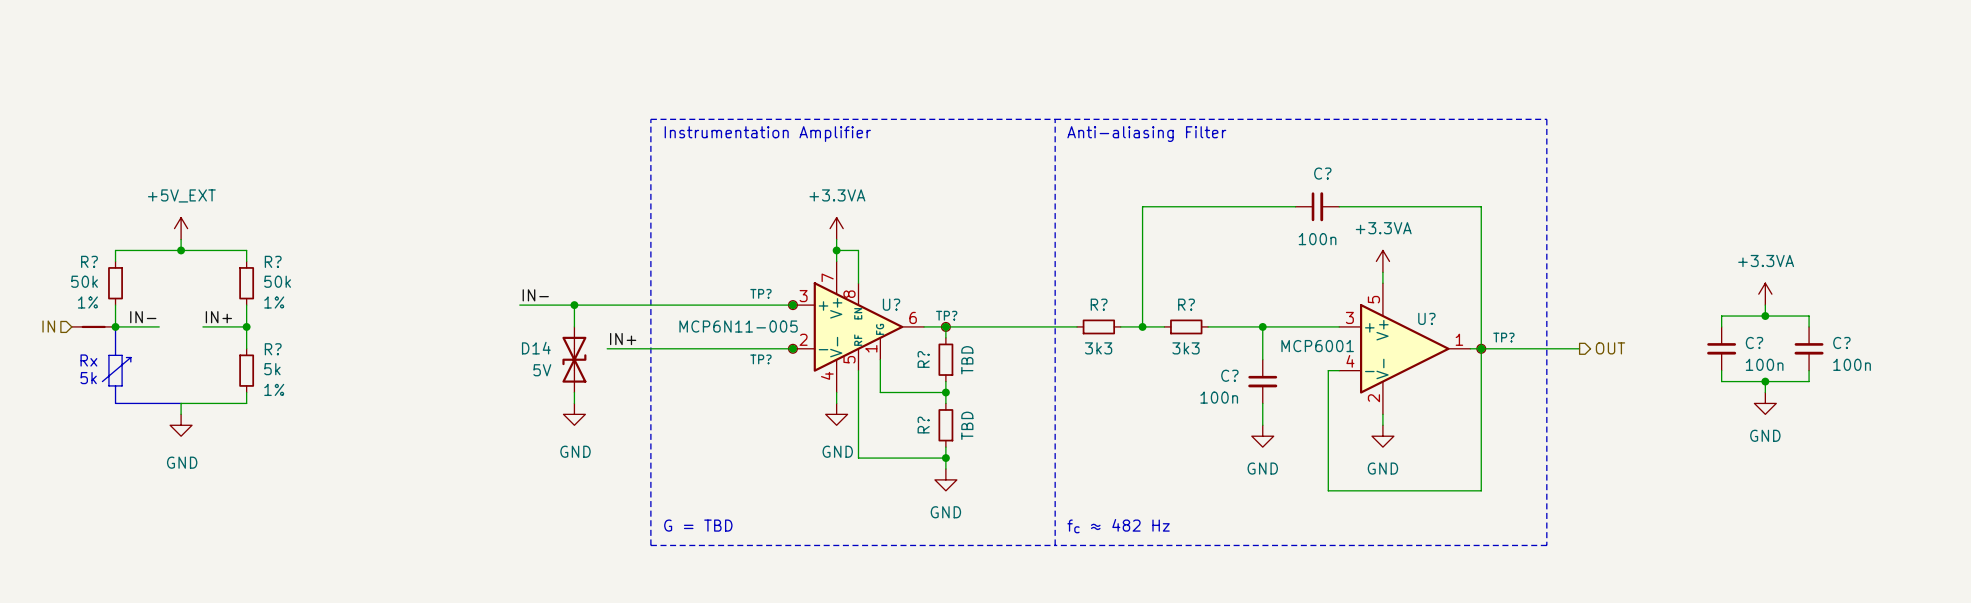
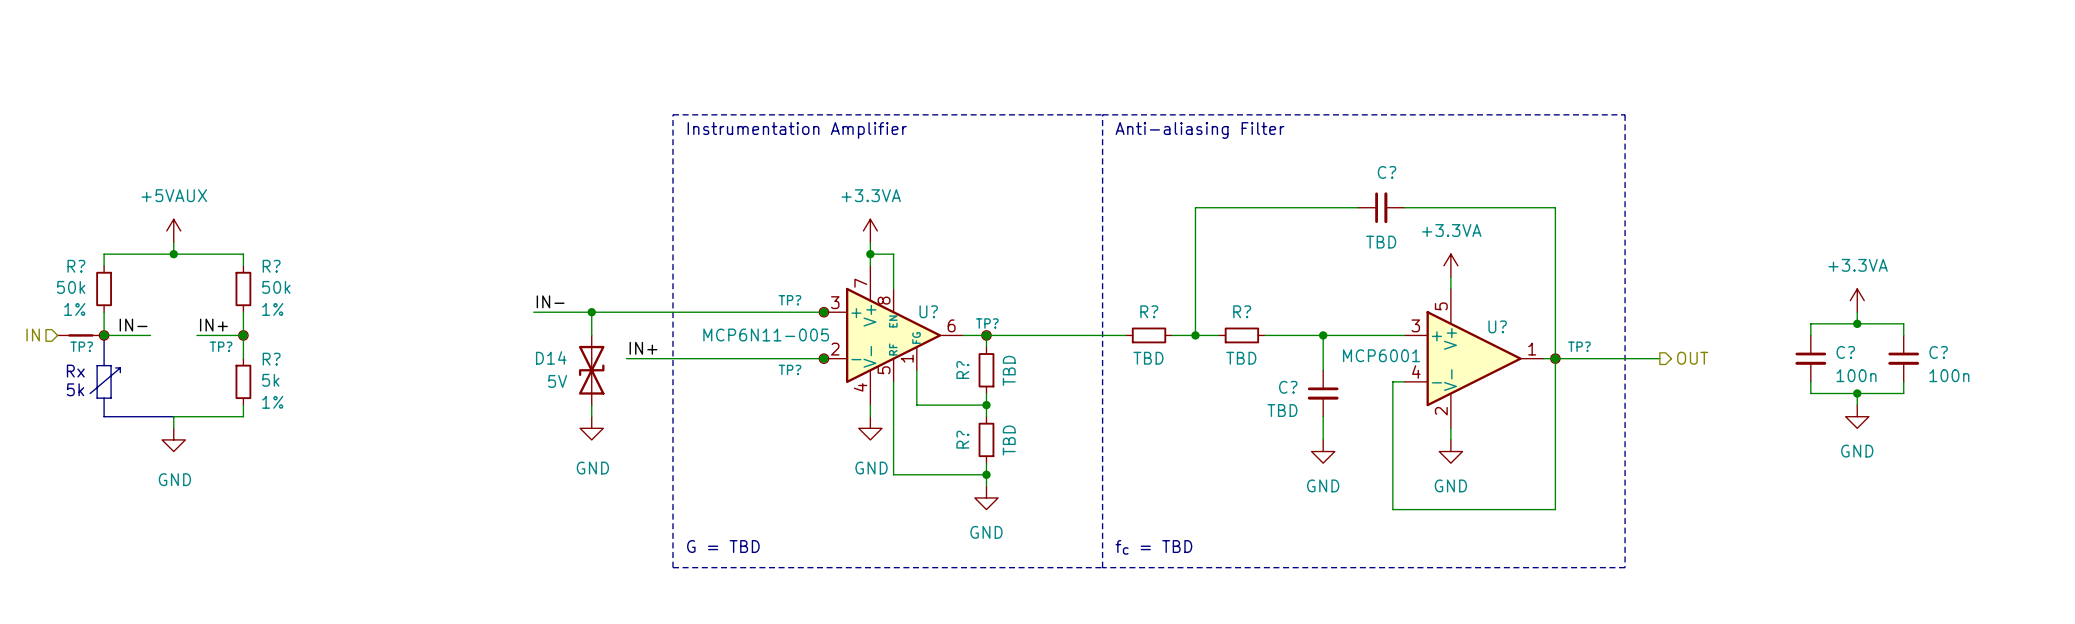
power symbol: +5V_EXT (181, 228) -> +5VAUX (173, 230)
C? value: 100n (1317, 239) -> TBD (1381, 242)
TP?: none -> (104, 335)
TP?: none -> (243, 335)
R? value: 3k3 (1098, 348) -> TBD (1148, 358)
R? value: 3k3 (1186, 348) -> TBD (1241, 358)
C? value: 100n (1219, 397) -> TBD (1282, 410)
text: fc ≈ 482 Hz (1118, 526) -> fc = TBD (1153, 547)

